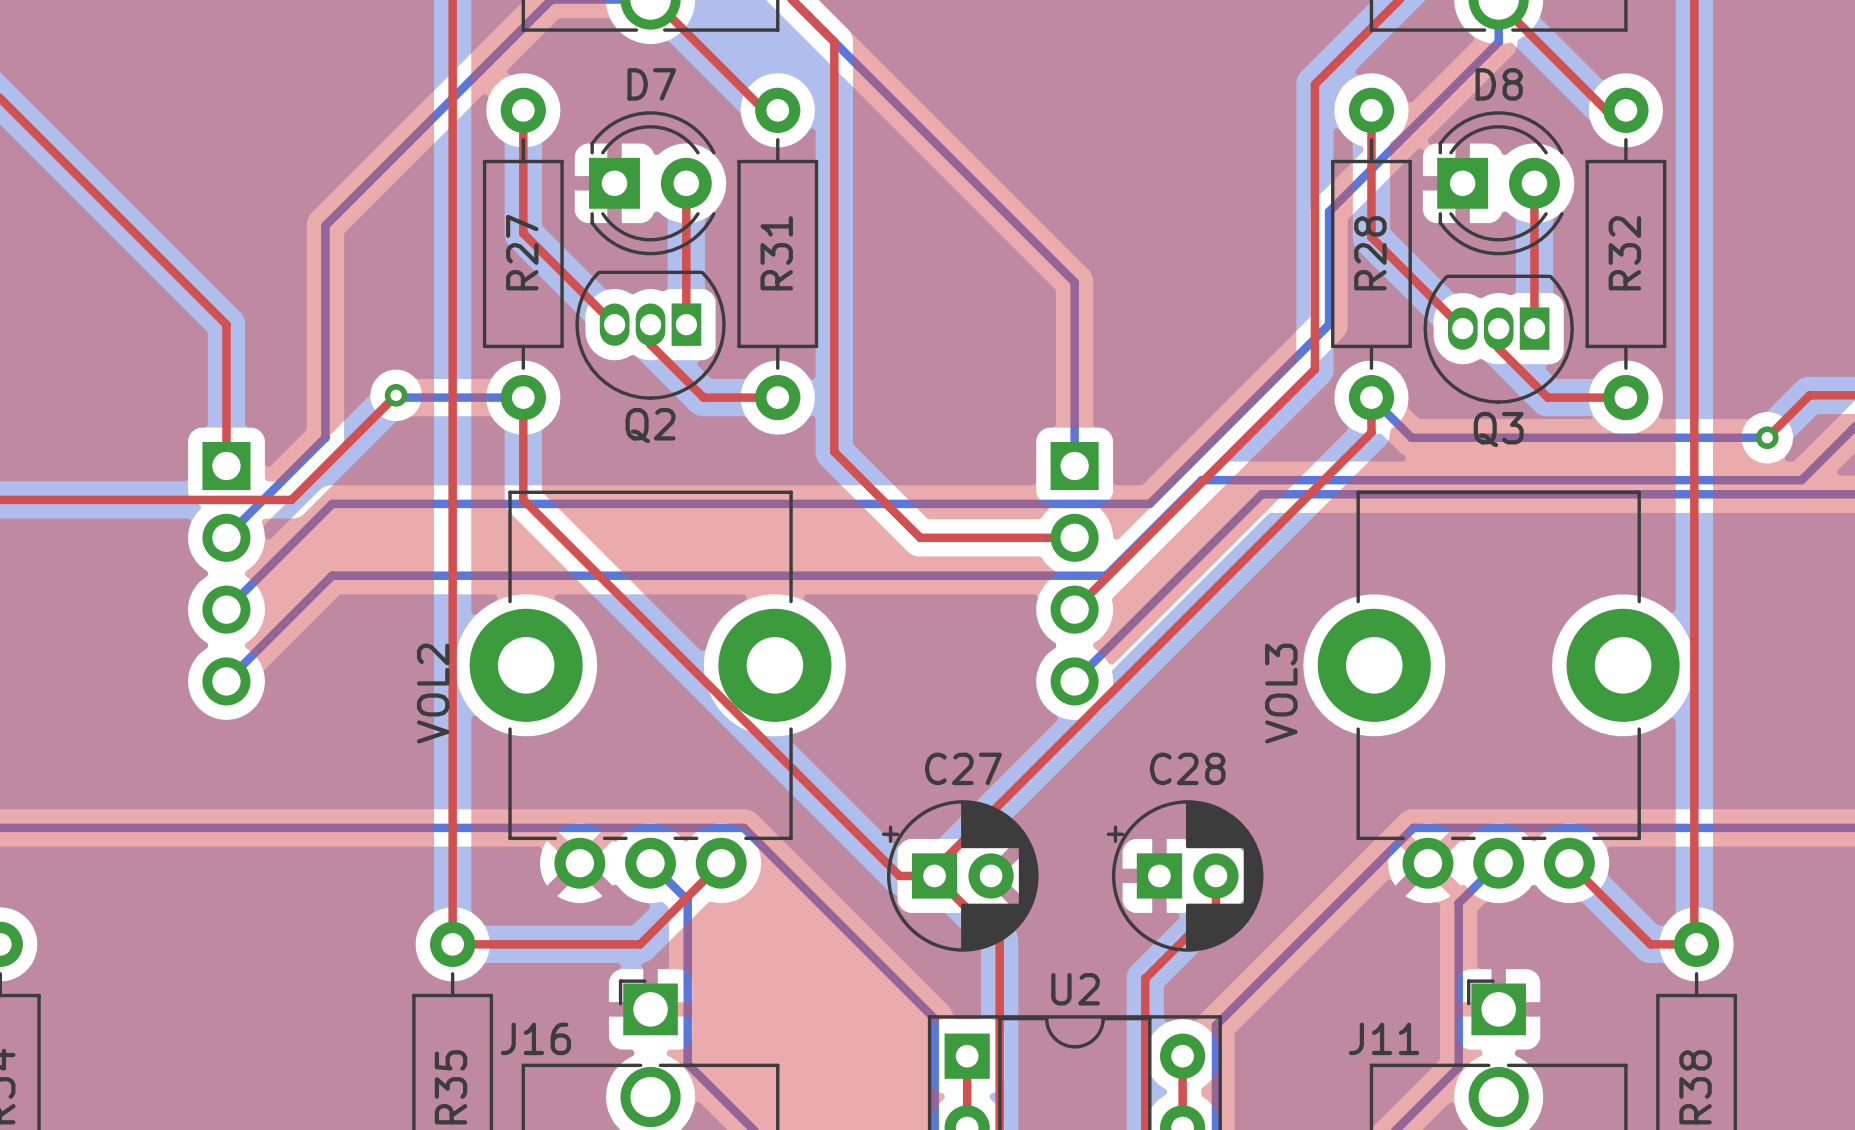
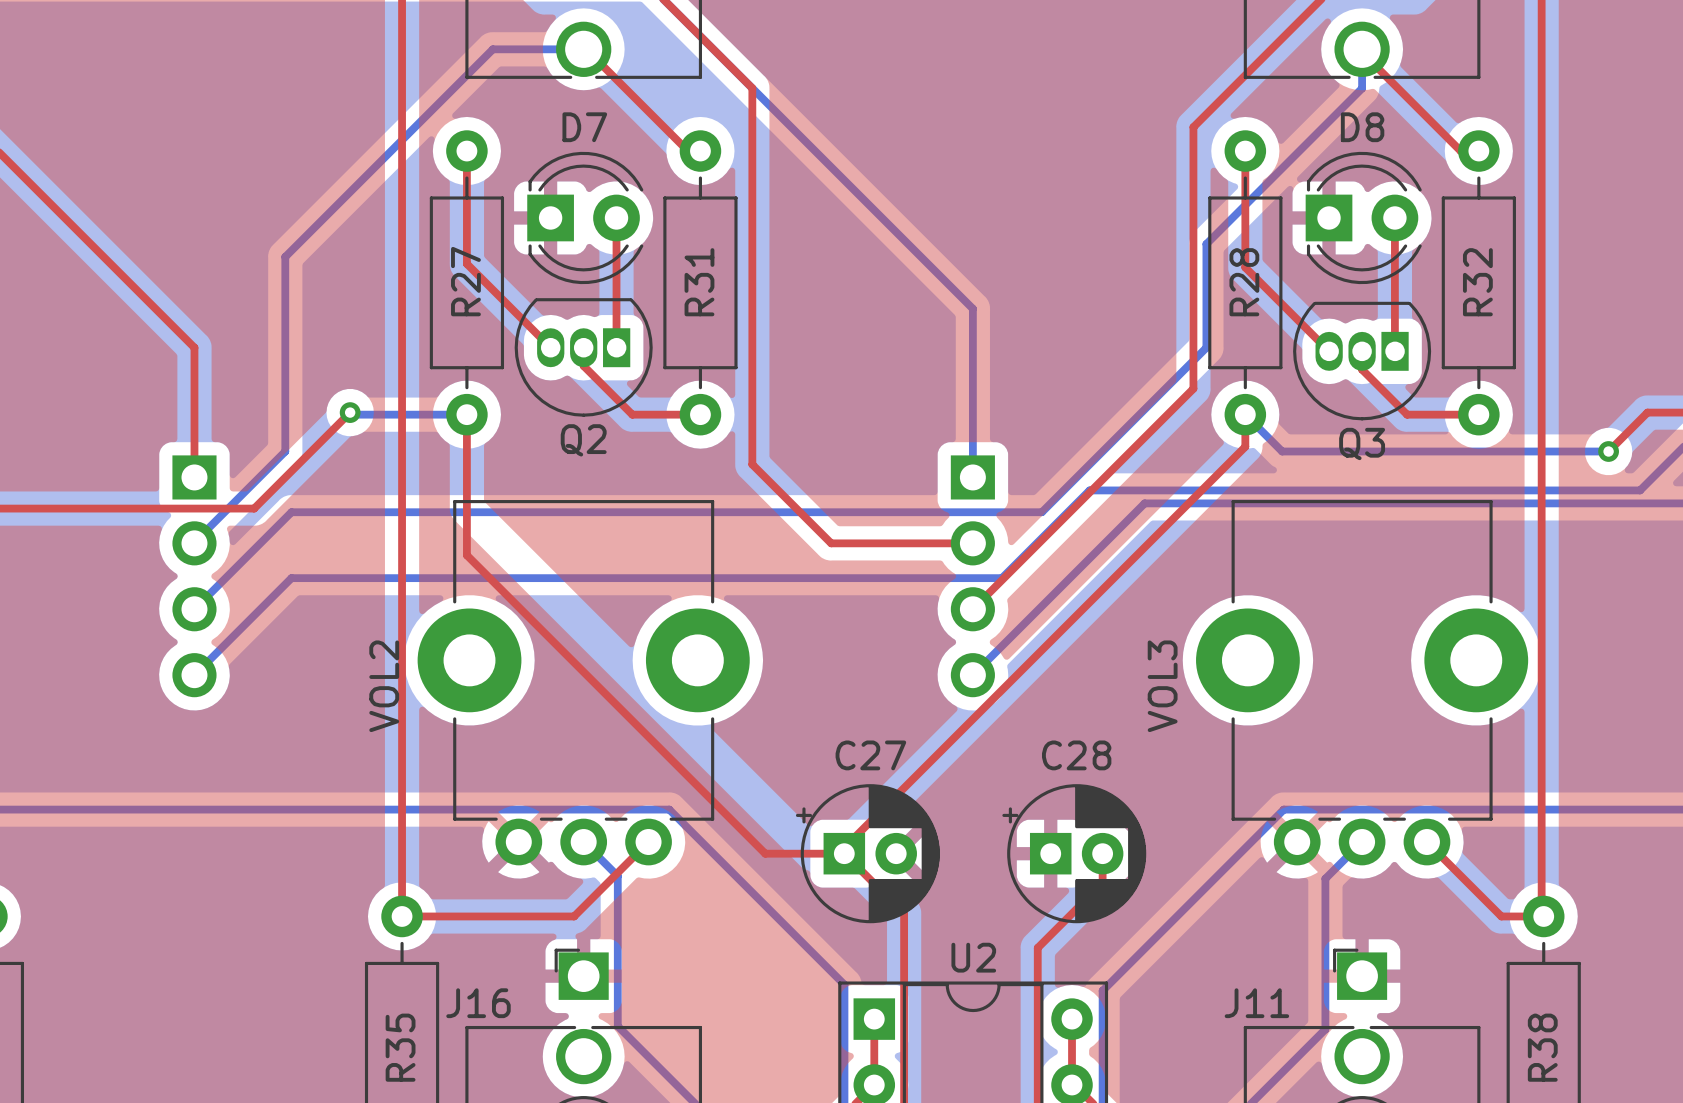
top track: (523, 499) (899, 875) -> (466, 508) (466, 555) (765, 853) (812, 853)

